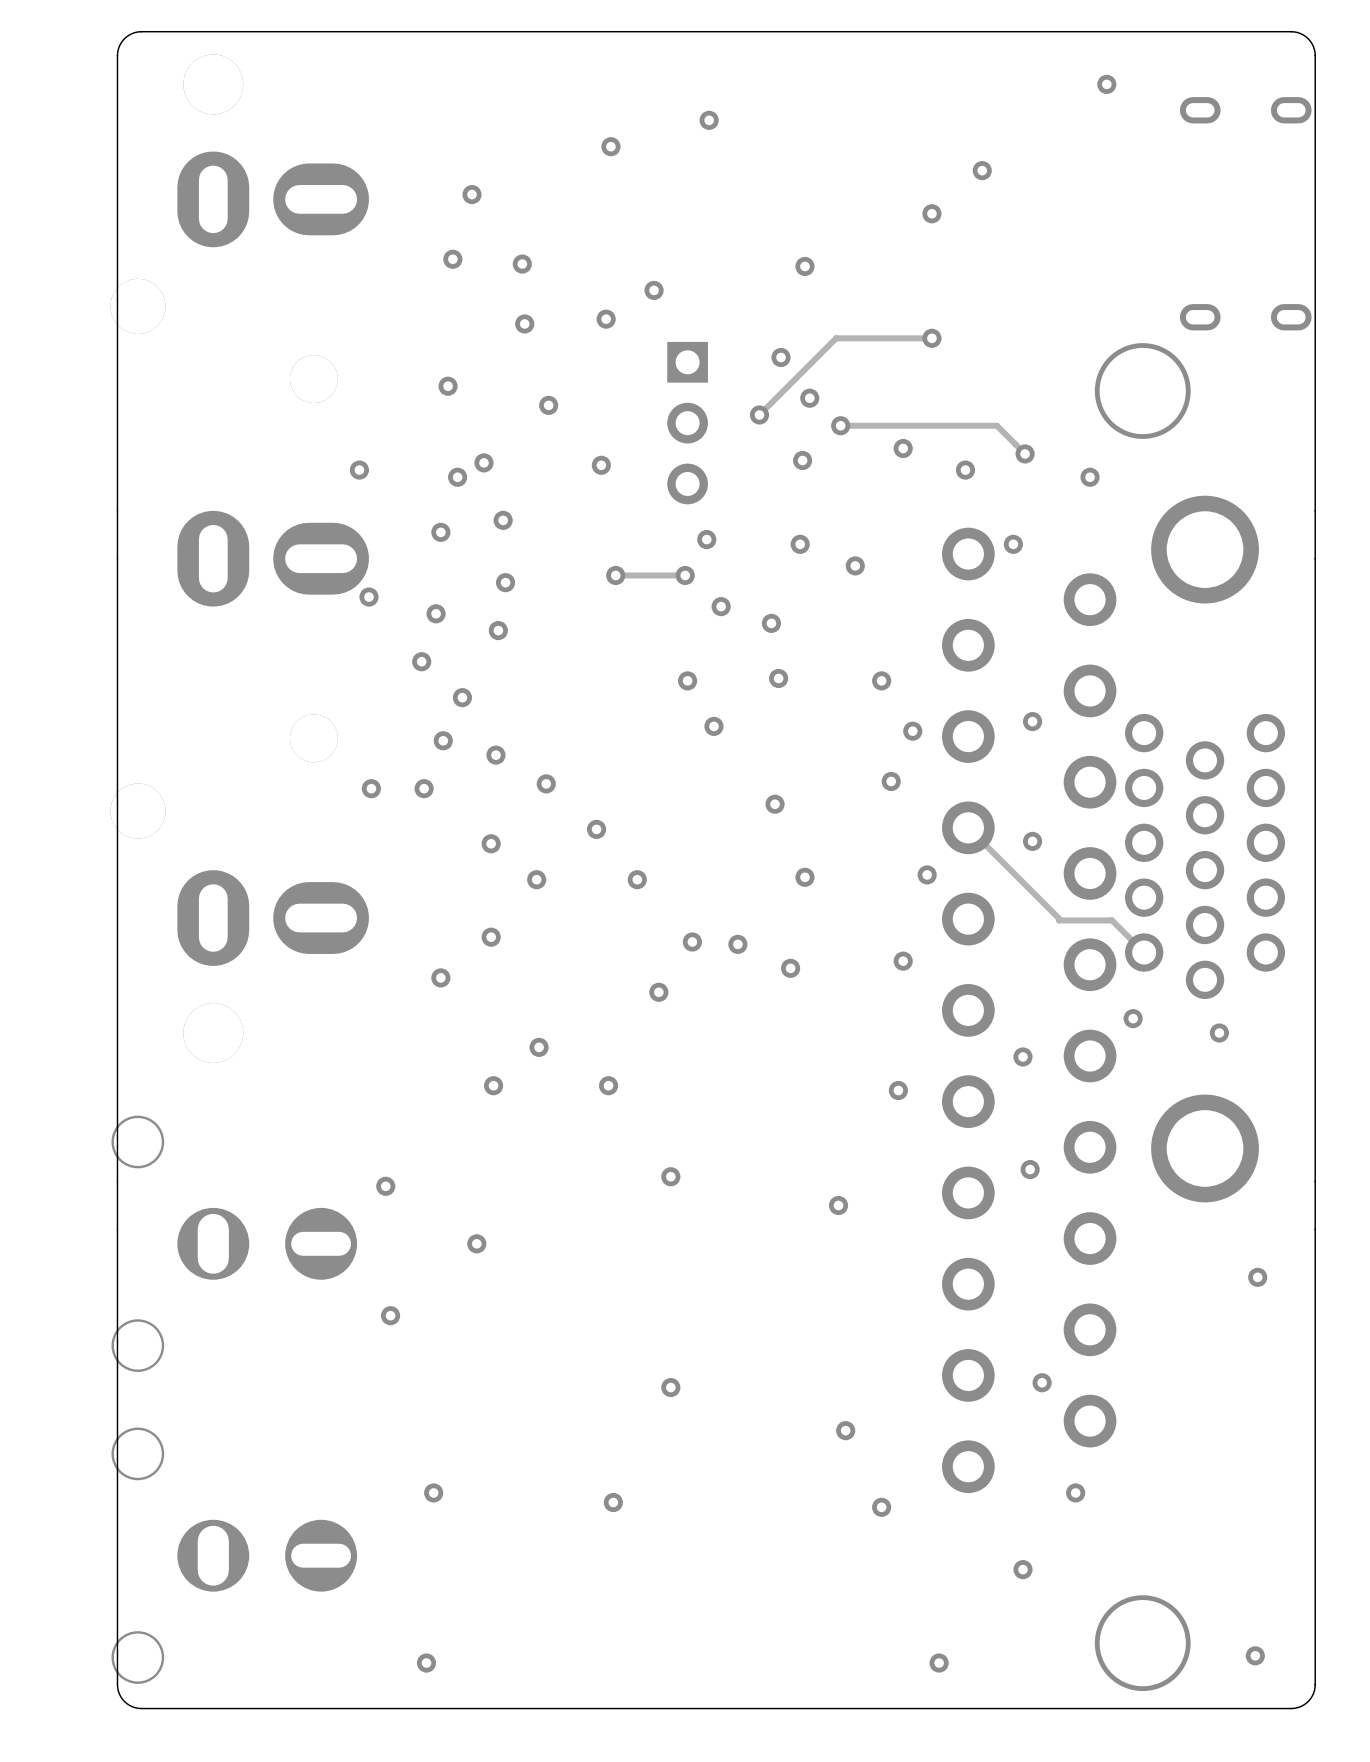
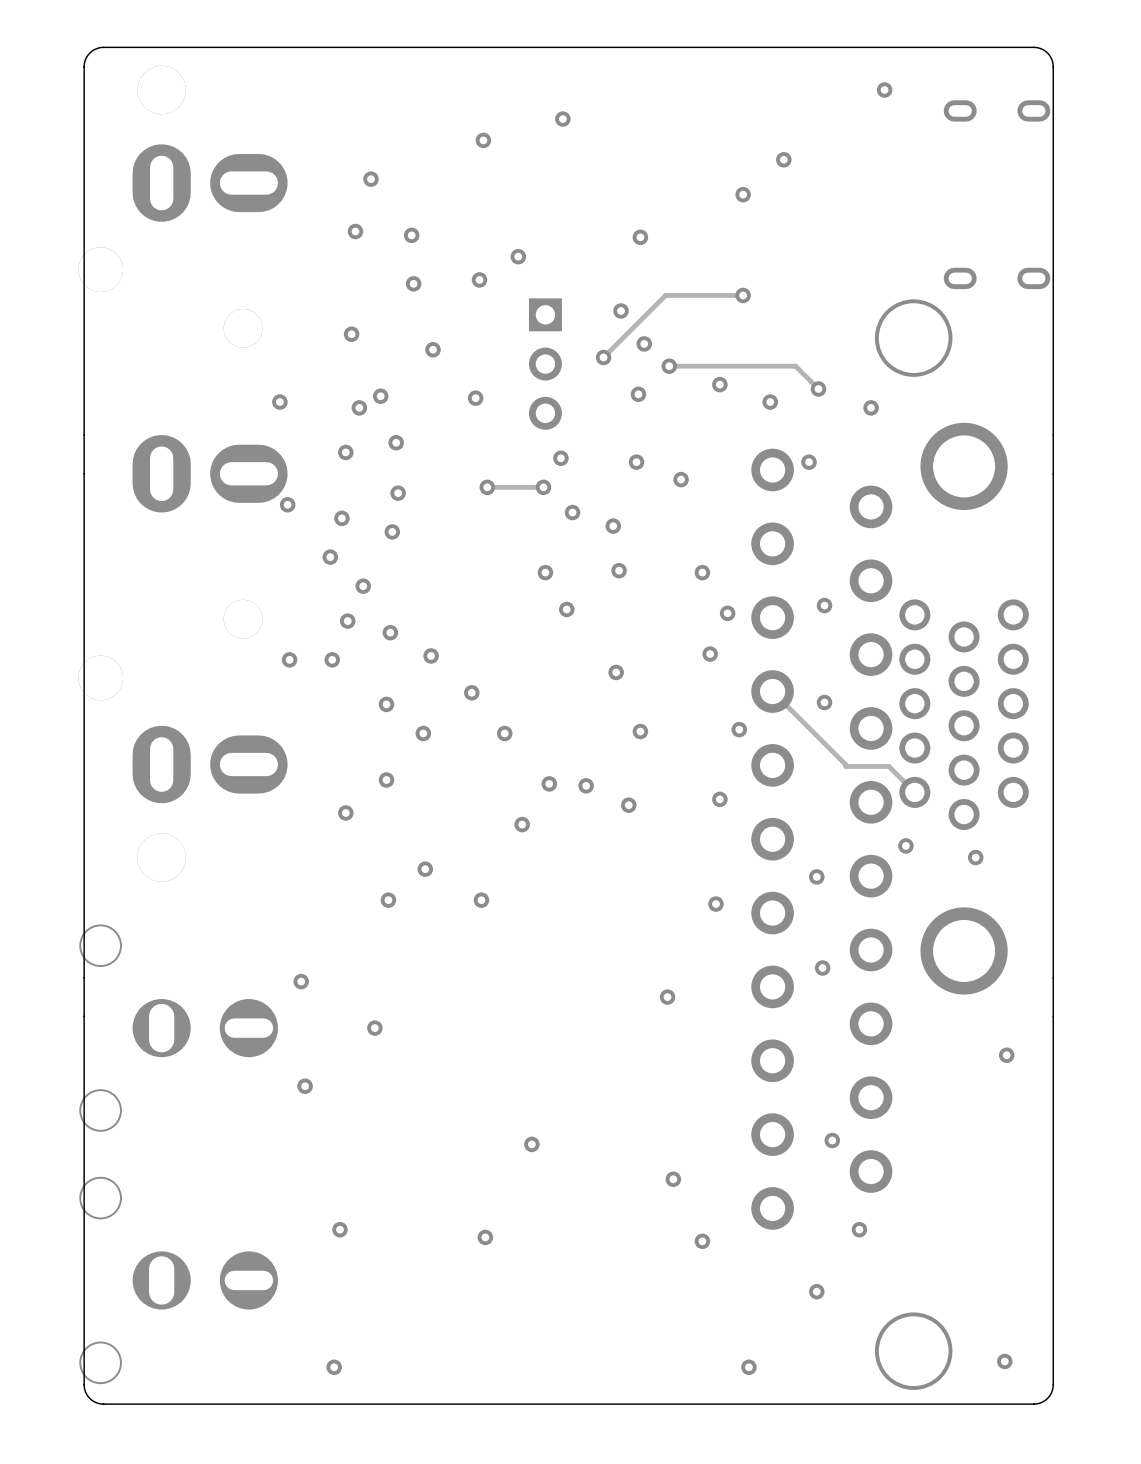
via: (670, 1176) -> none

